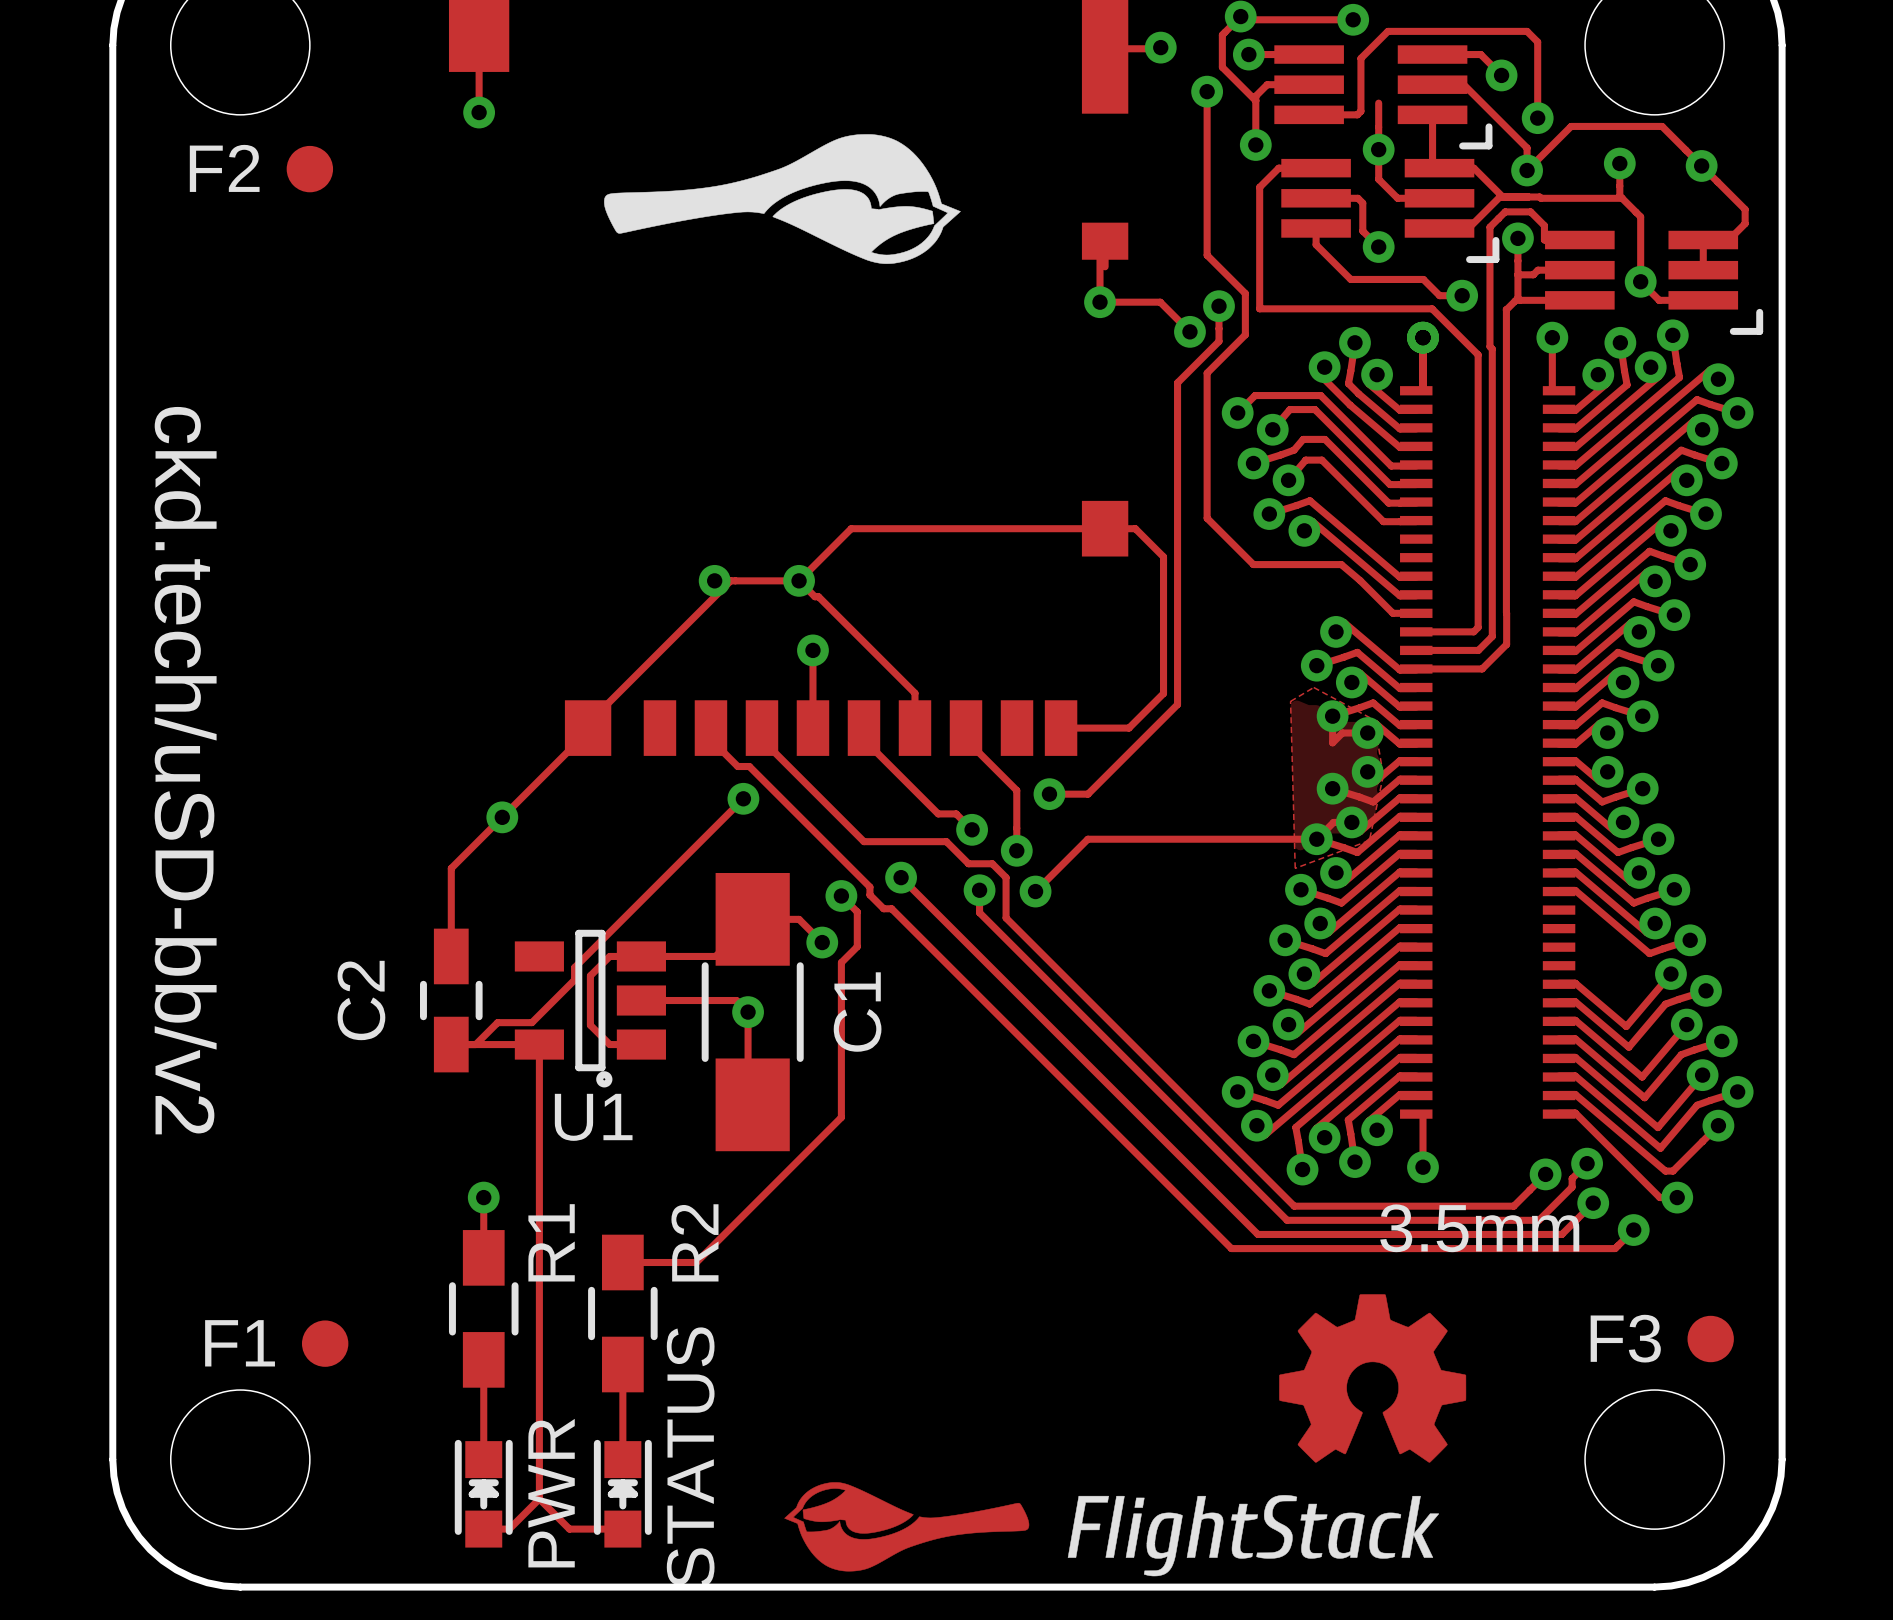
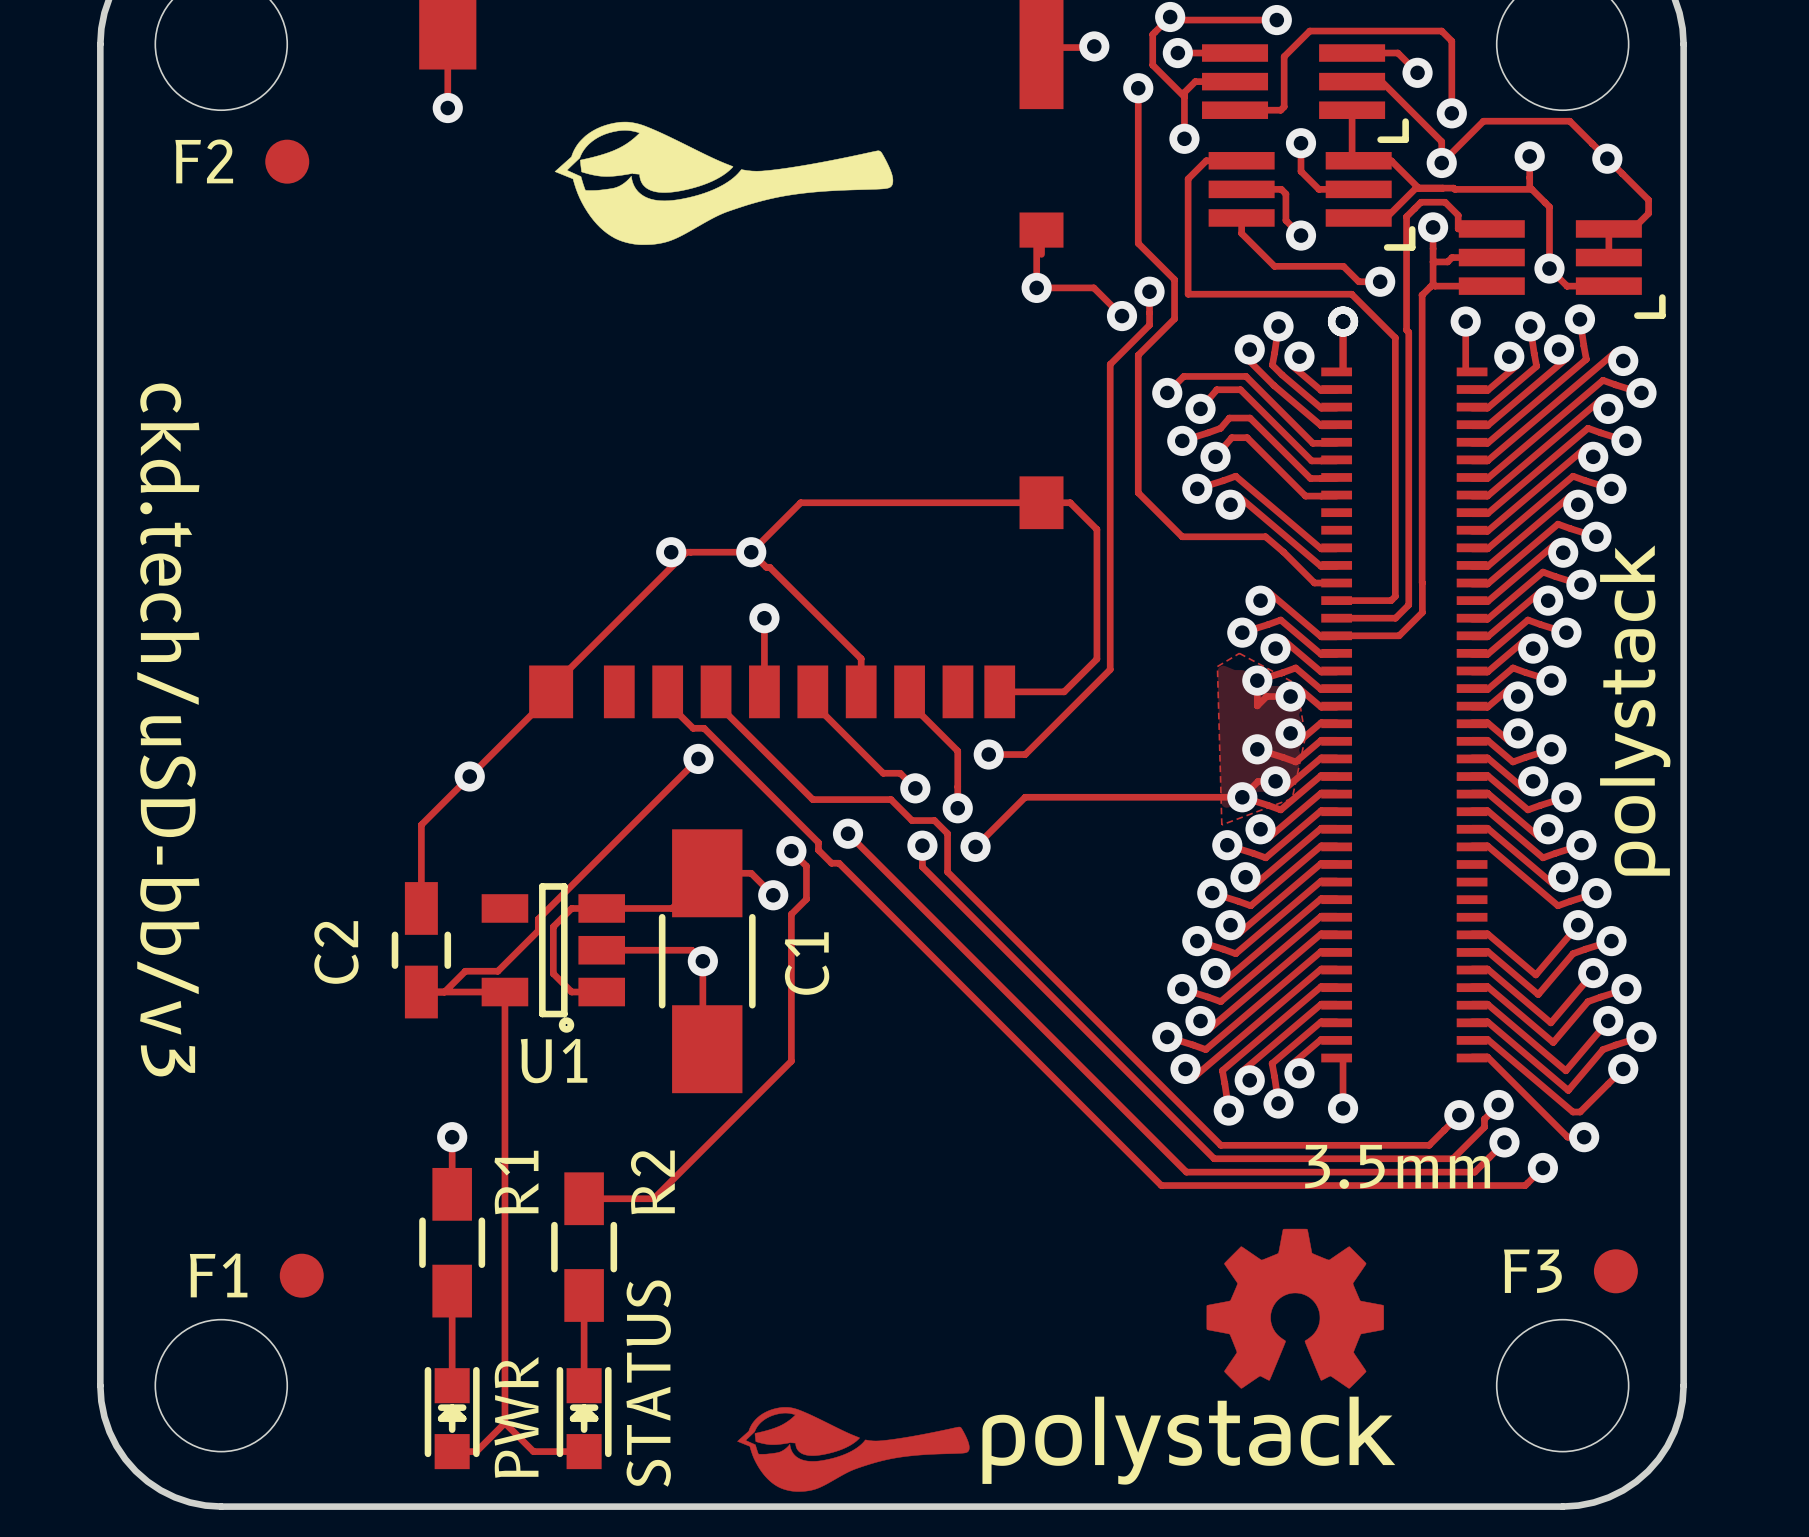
track: (1378, 103) (1378, 149) -> none
drawing shape: [604, 134, 961, 264] -> [554, 121, 894, 245]
drawing: none -> [1600, 545, 1671, 876]
text: ckd.tech/uSD-bb/v2 (185, 770) -> ckd.tech/uSD-bb/v3 (168, 729)
drawing shape: [1067, 1495, 1440, 1577] -> [982, 1396, 1396, 1485]

